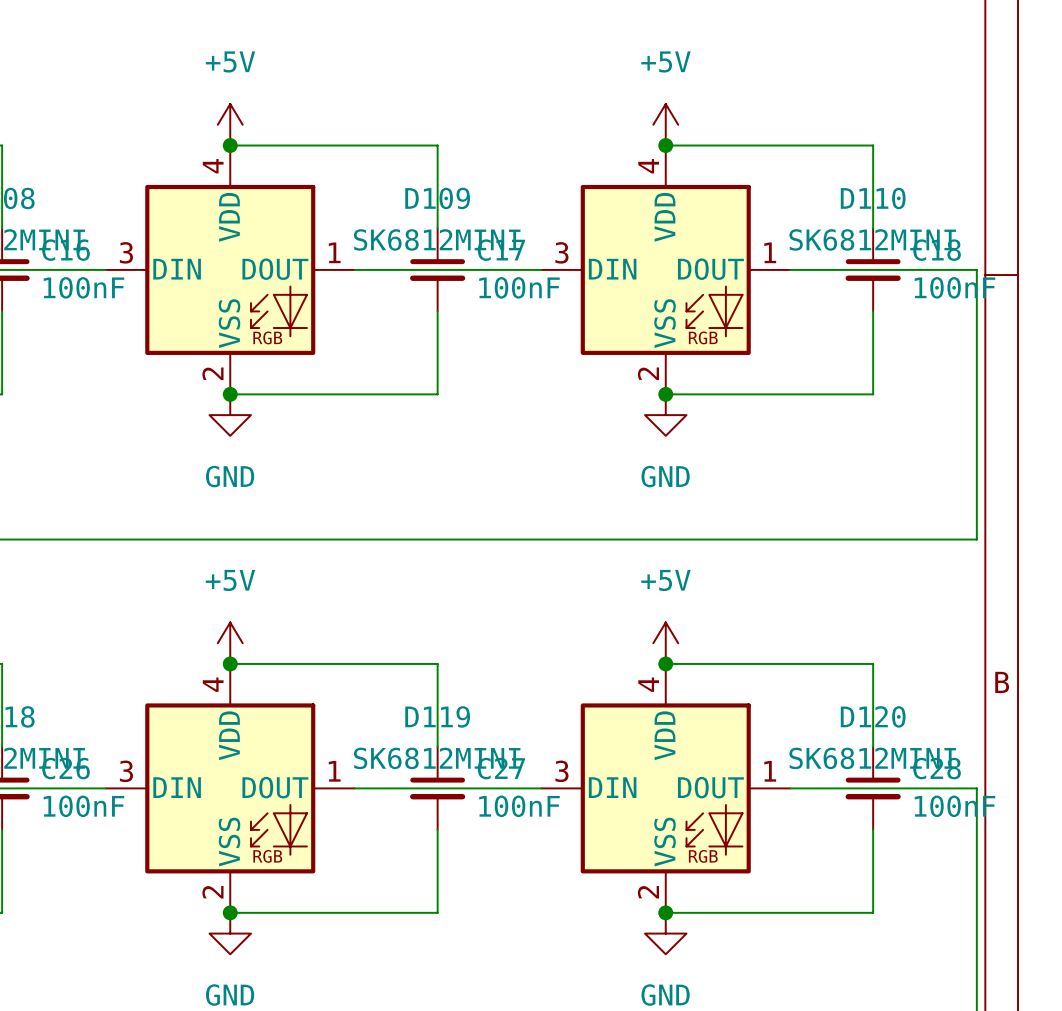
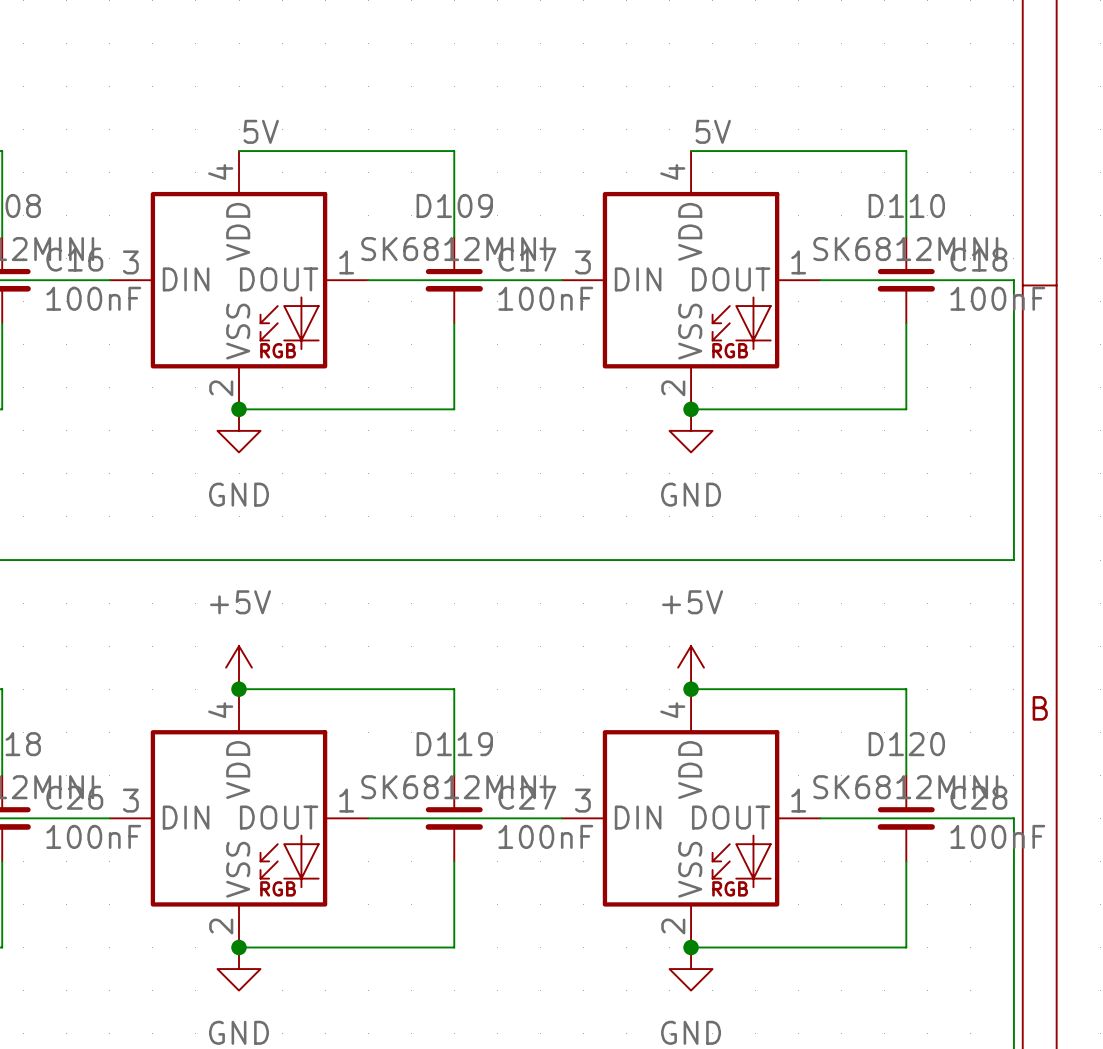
power symbol: +5V (230, 124) -> none
power symbol: +5V (665, 124) -> none
label: none -> 5V (261, 131)
label: none -> 5V (713, 131)
junction: (230, 145) -> none
junction: (665, 145) -> none

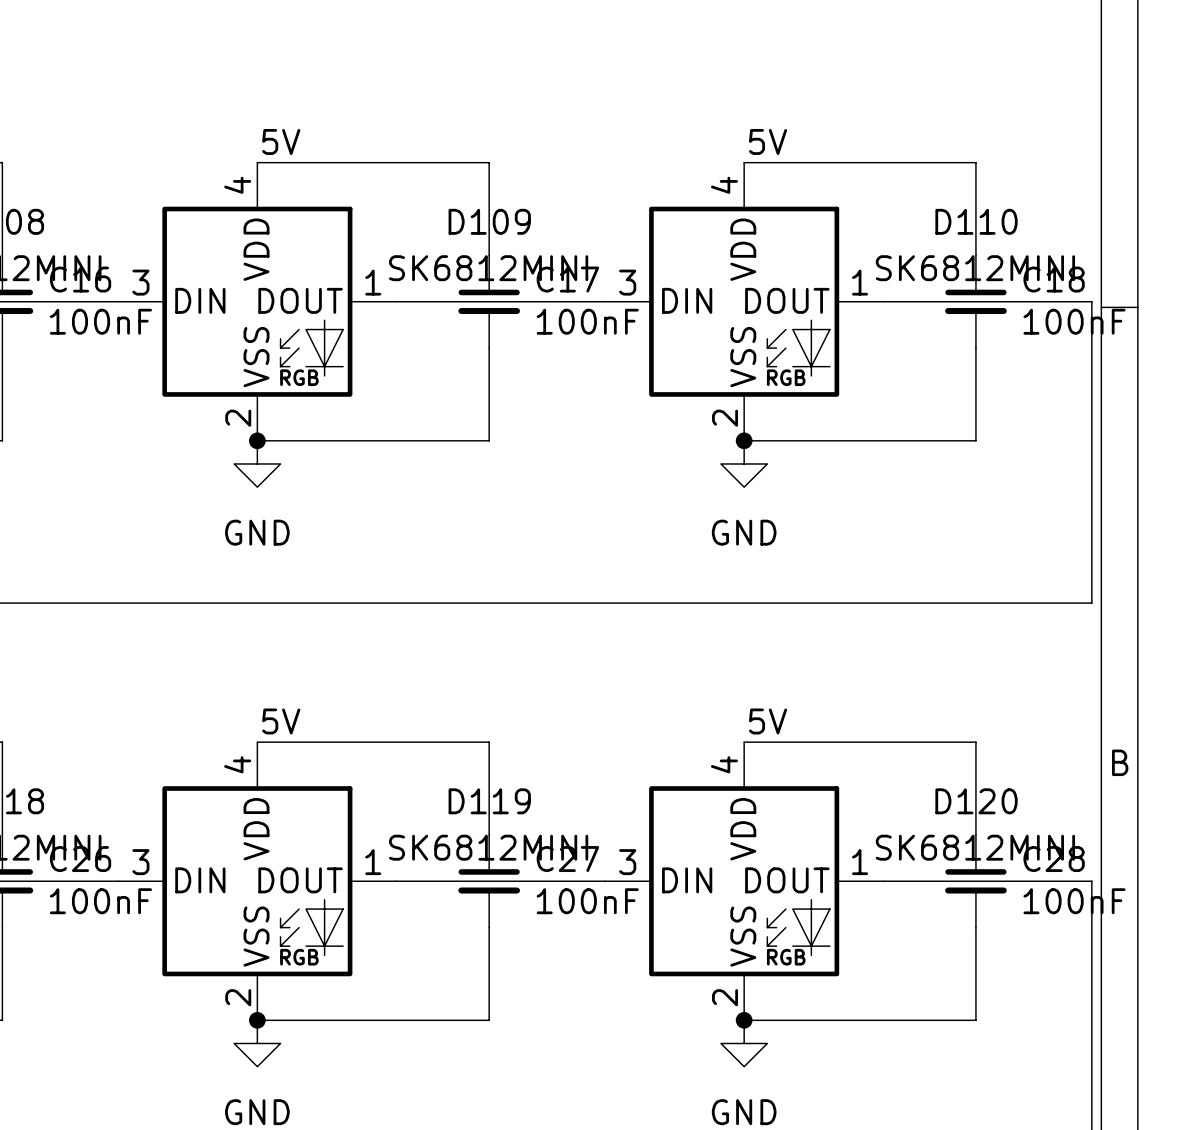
power symbol: +5V (239, 667) -> none
power symbol: +5V (691, 667) -> none
label: none -> 5V (281, 721)
label: none -> 5V (768, 721)
junction: (239, 689) -> none
junction: (691, 689) -> none

